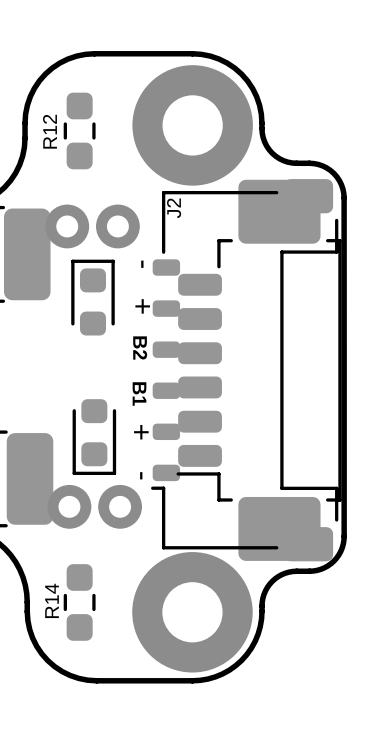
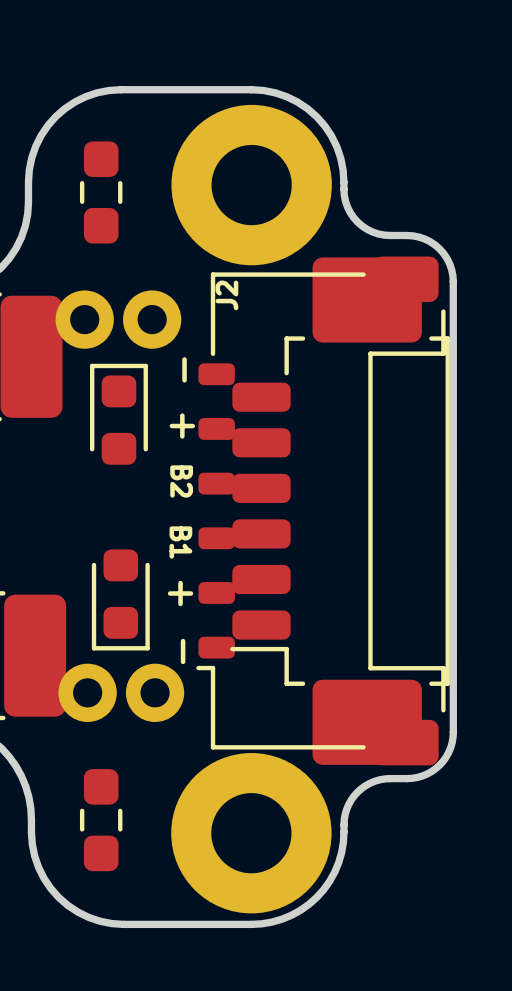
R12 name: R12 (49, 131) -> none
R14 name: R14 (52, 600) -> none

